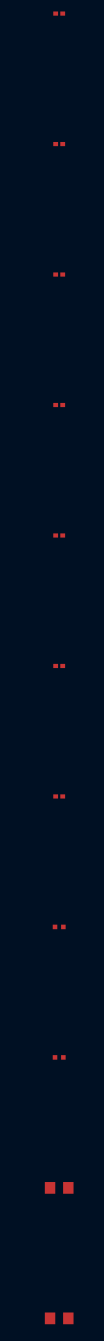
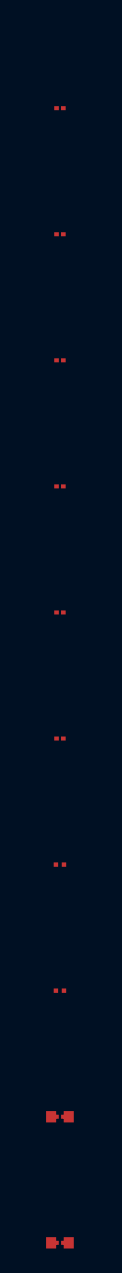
part: none -> (59, 1116)
part: none -> (59, 1242)

